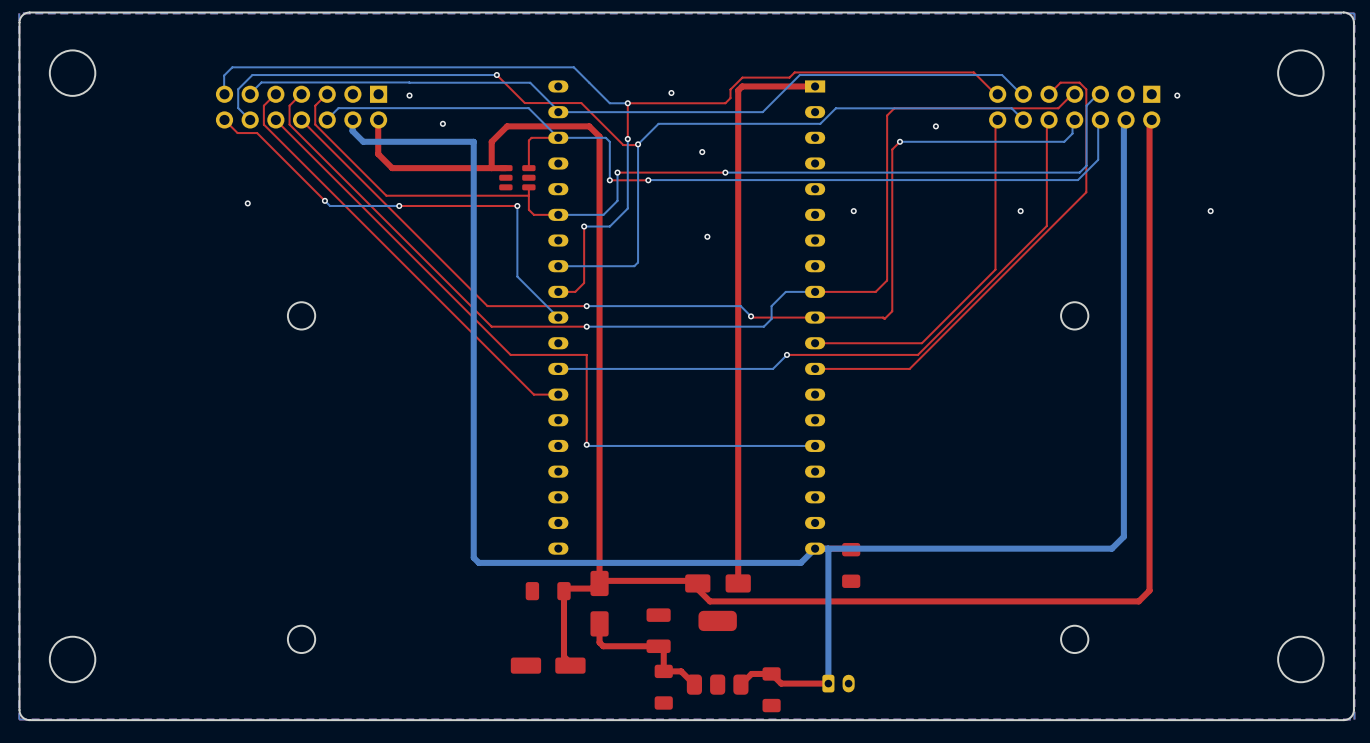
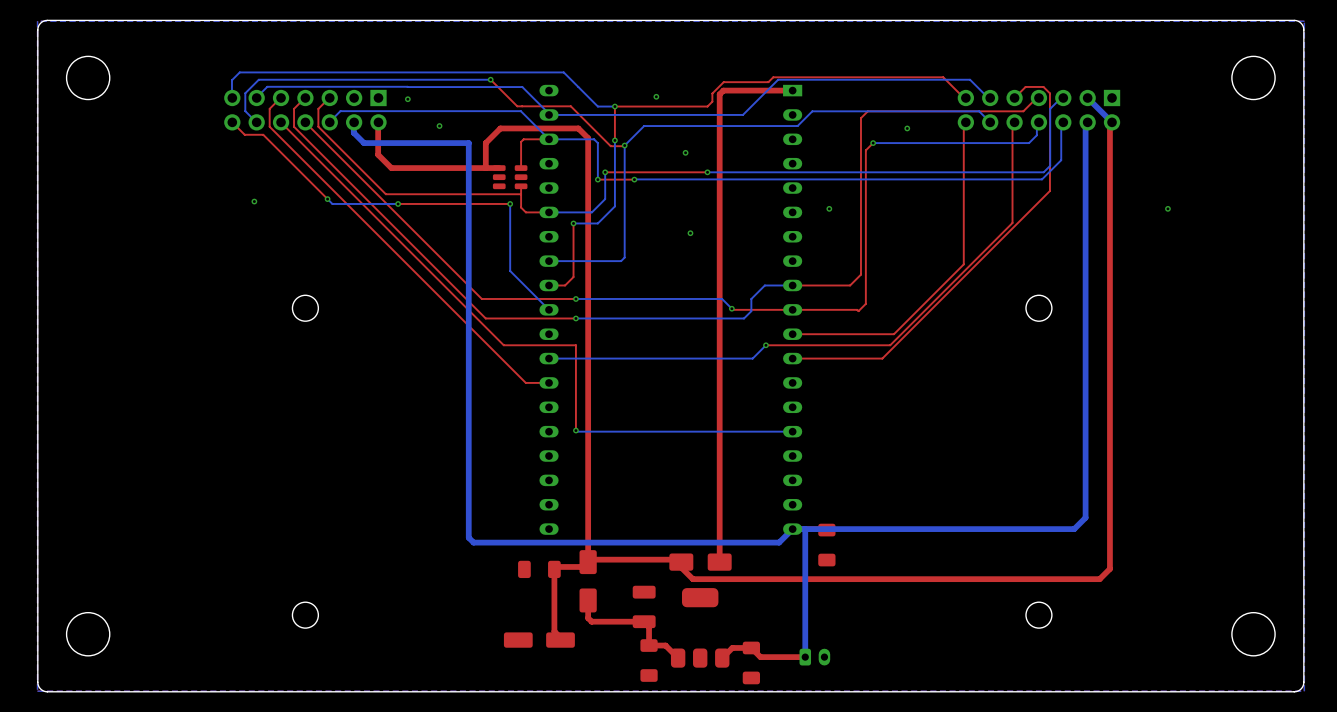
bottom track: none -> (1087, 98) (1112, 122)
via: (1177, 95) -> none
via: (1020, 211) -> none

